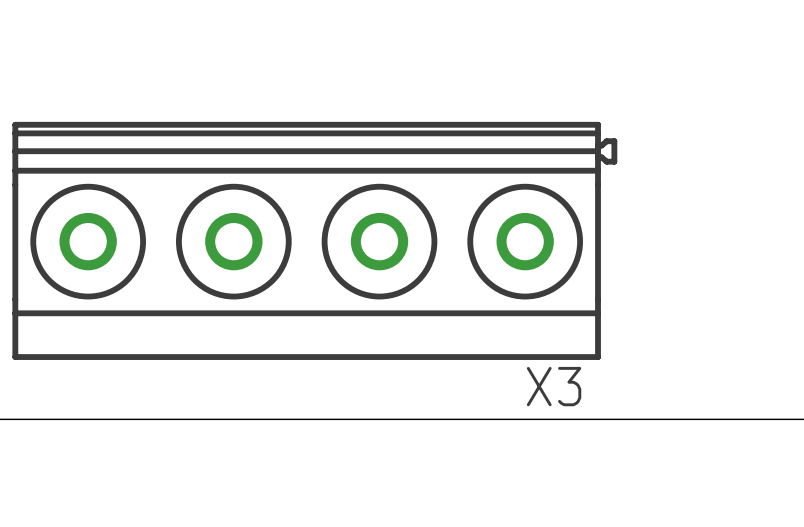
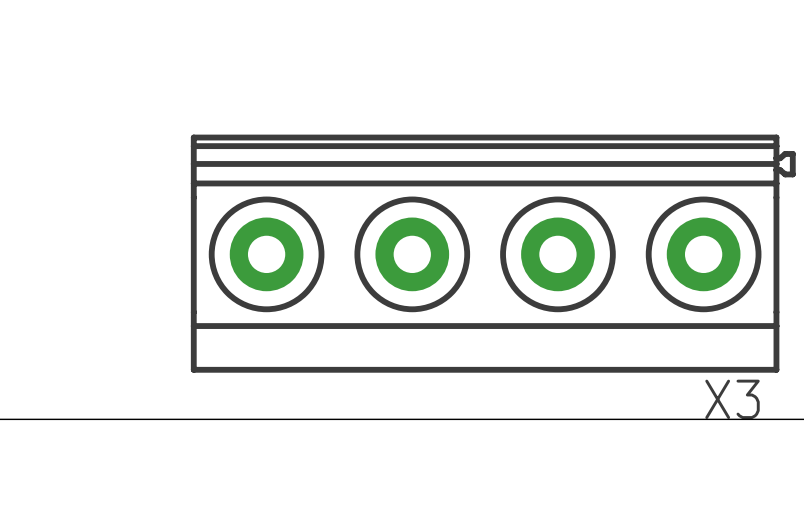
X3 footprint: [12, 121, 618, 360] -> [190, 134, 796, 373]

